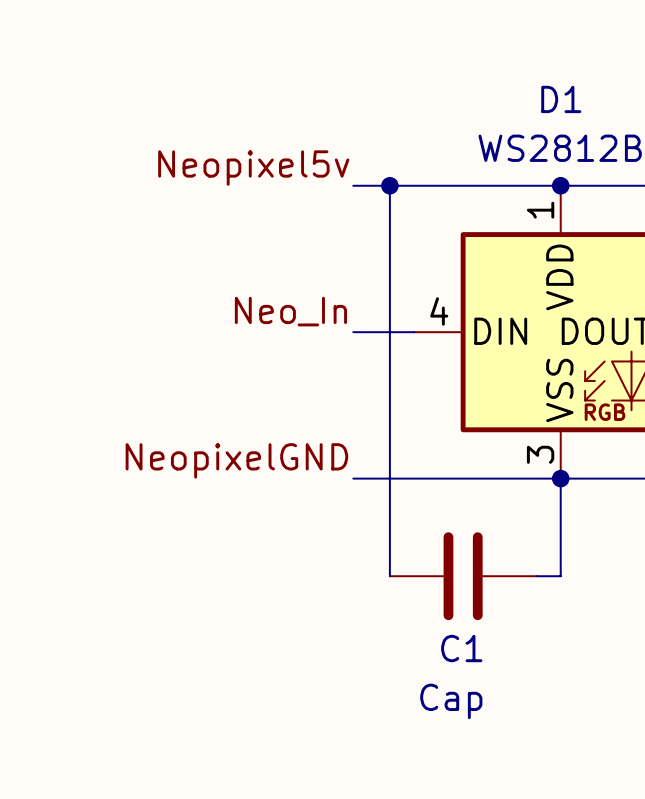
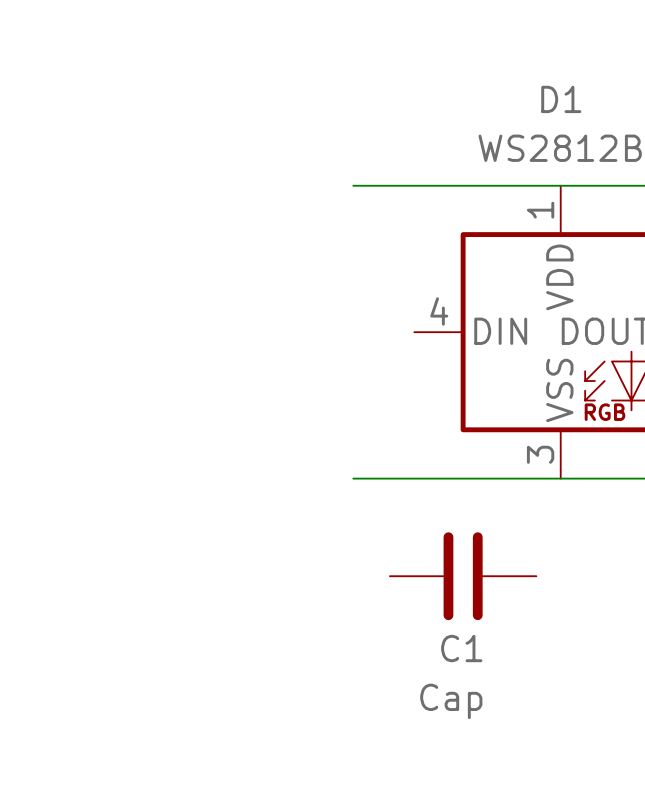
label: Neopixel5v (253, 168) -> none
wire: (389, 185) (389, 576) -> none
junction: (389, 185) -> none
junction: (560, 185) -> none
label: Neo_In (290, 311) -> none
wire: (353, 332) (414, 332) -> none
label: NeopixelGND (236, 460) -> none
wire: (560, 478) (560, 576) (536, 576) -> none
junction: (560, 478) -> none

